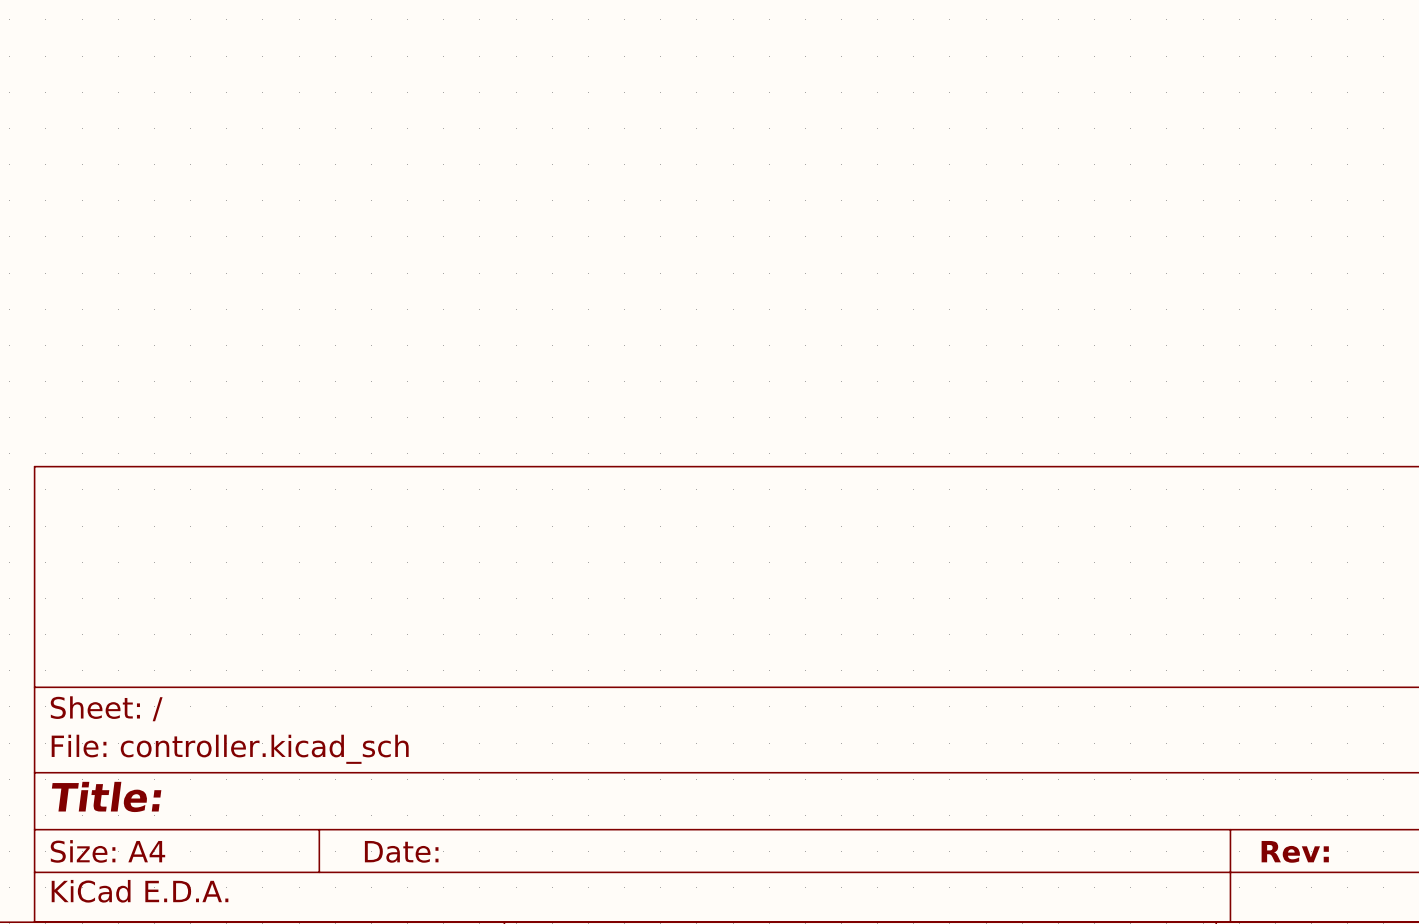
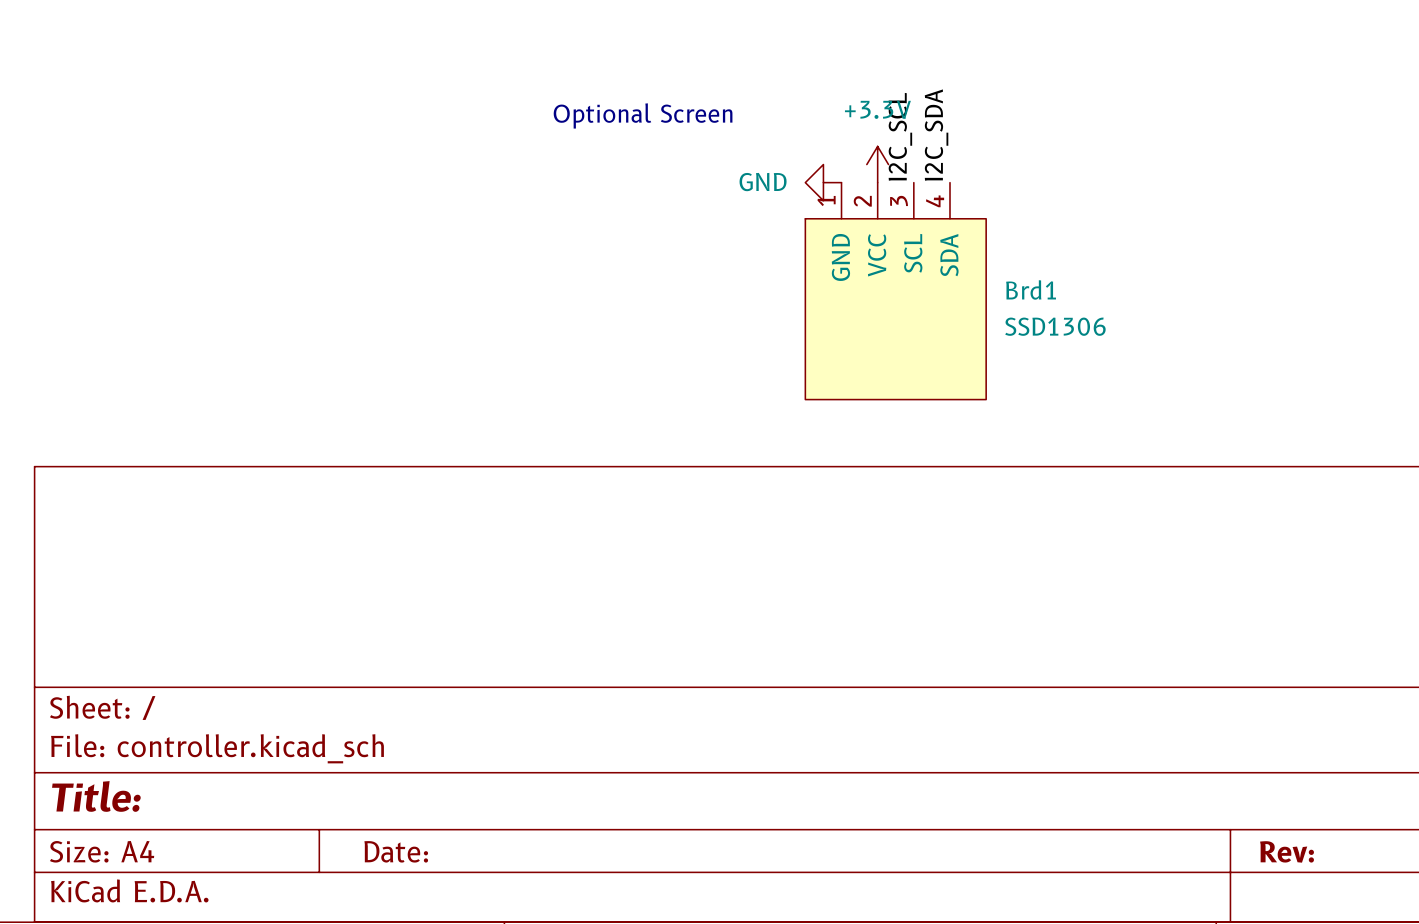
text: none -> Optional Screen (643, 115)
label: none -> I2C_SDA (936, 135)
label: none -> I2C_SCL (900, 136)
power symbol: none -> +3.3V (877, 164)
power symbol: none -> GND (823, 182)
Brd1: none -> SSD1306 (895, 291)

